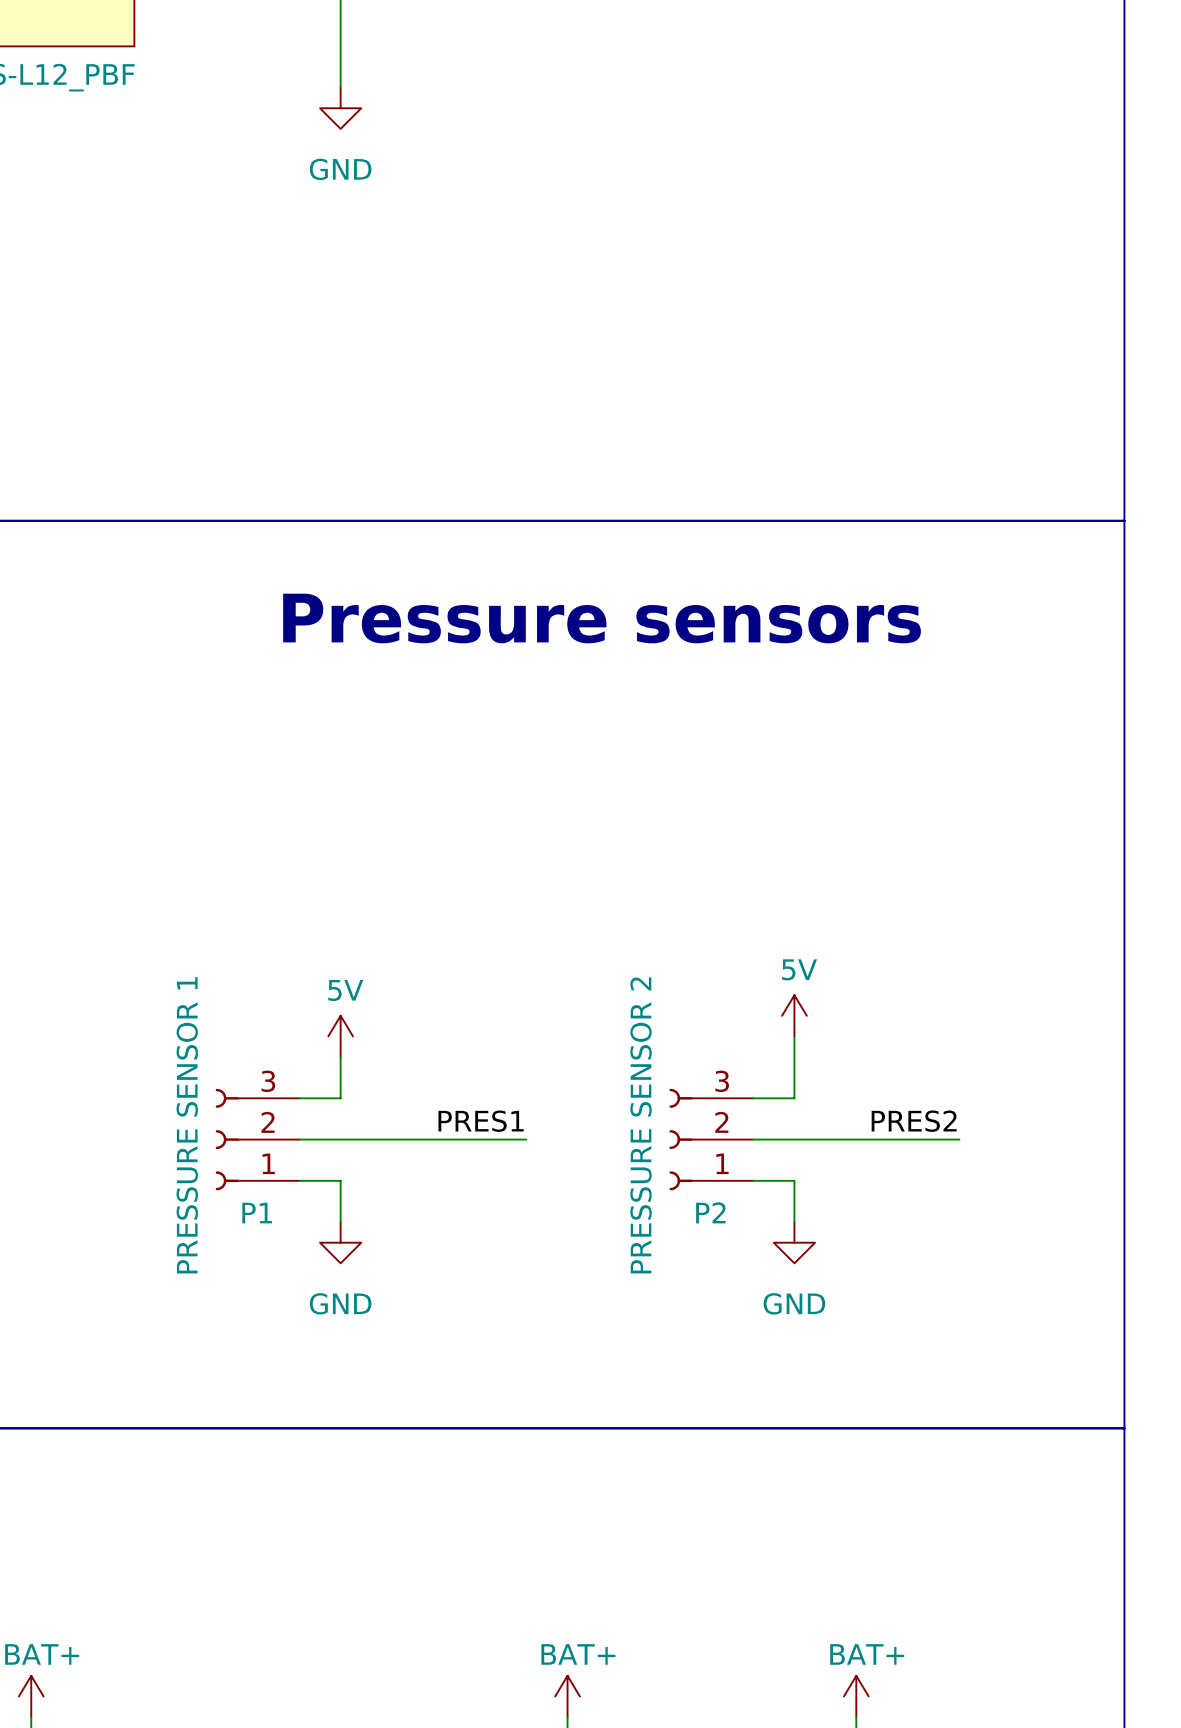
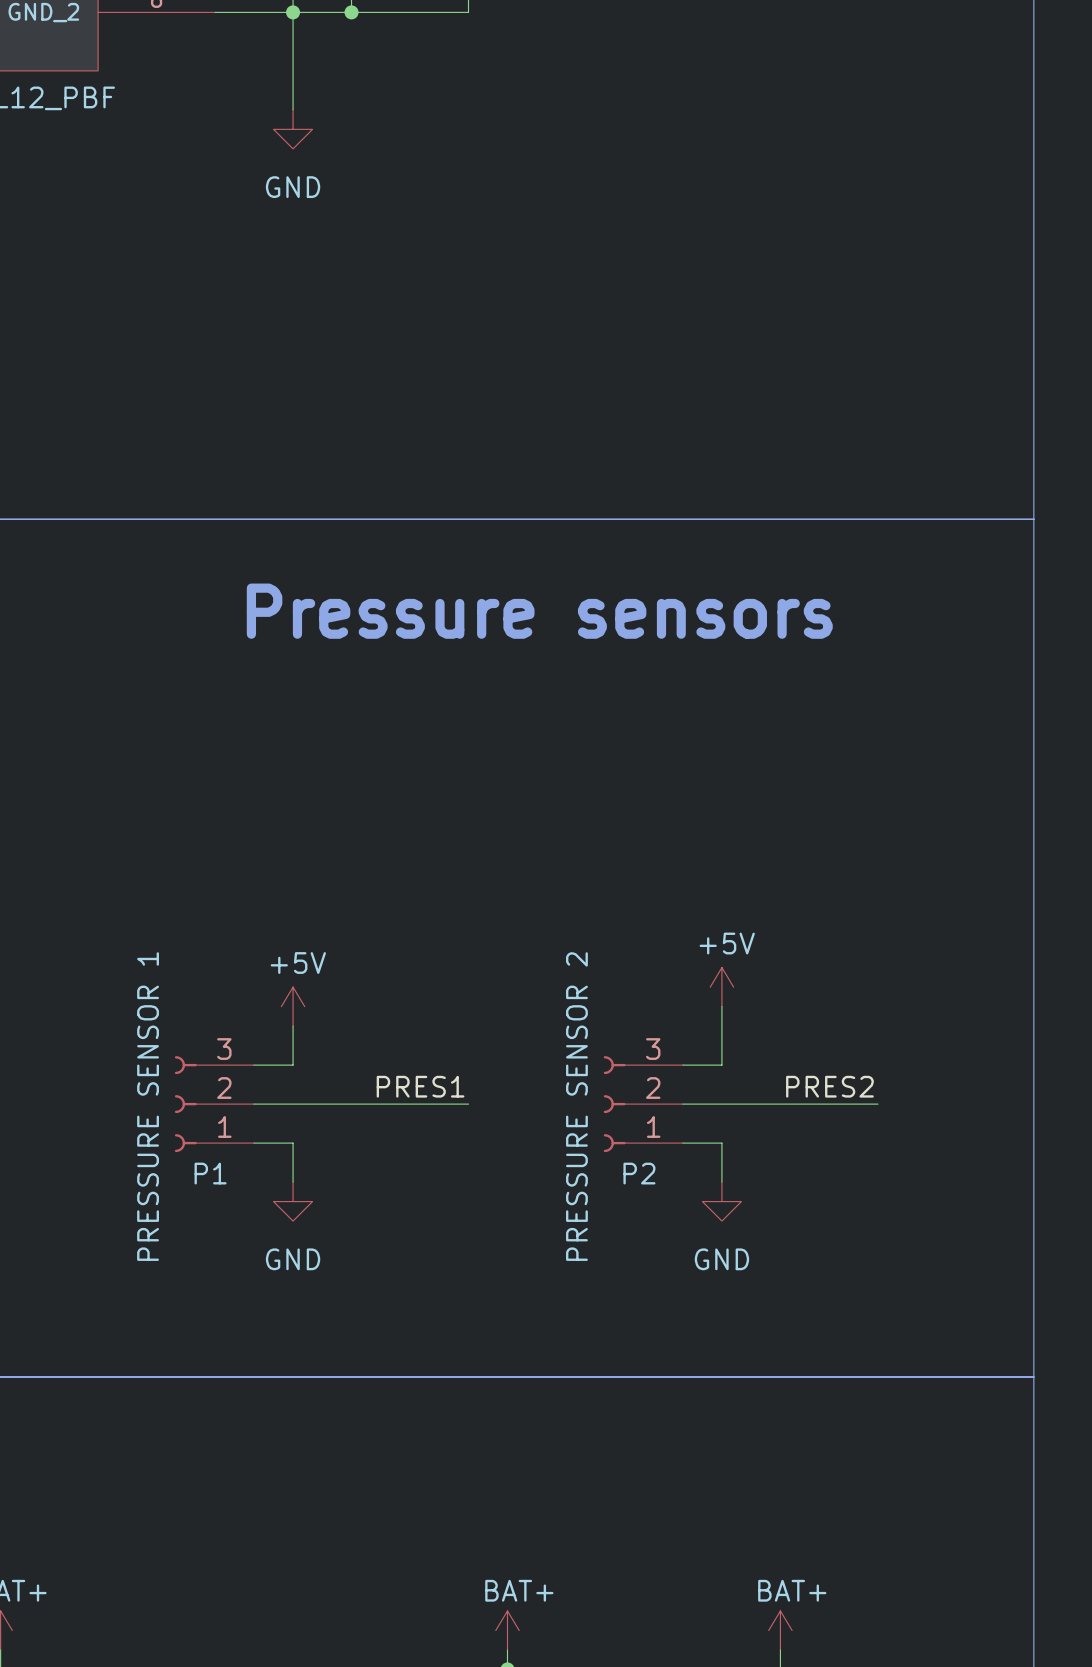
power symbol: 5V (794, 1015) -> +5V (721, 987)
power symbol: 5V (340, 1036) -> +5V (293, 1006)

